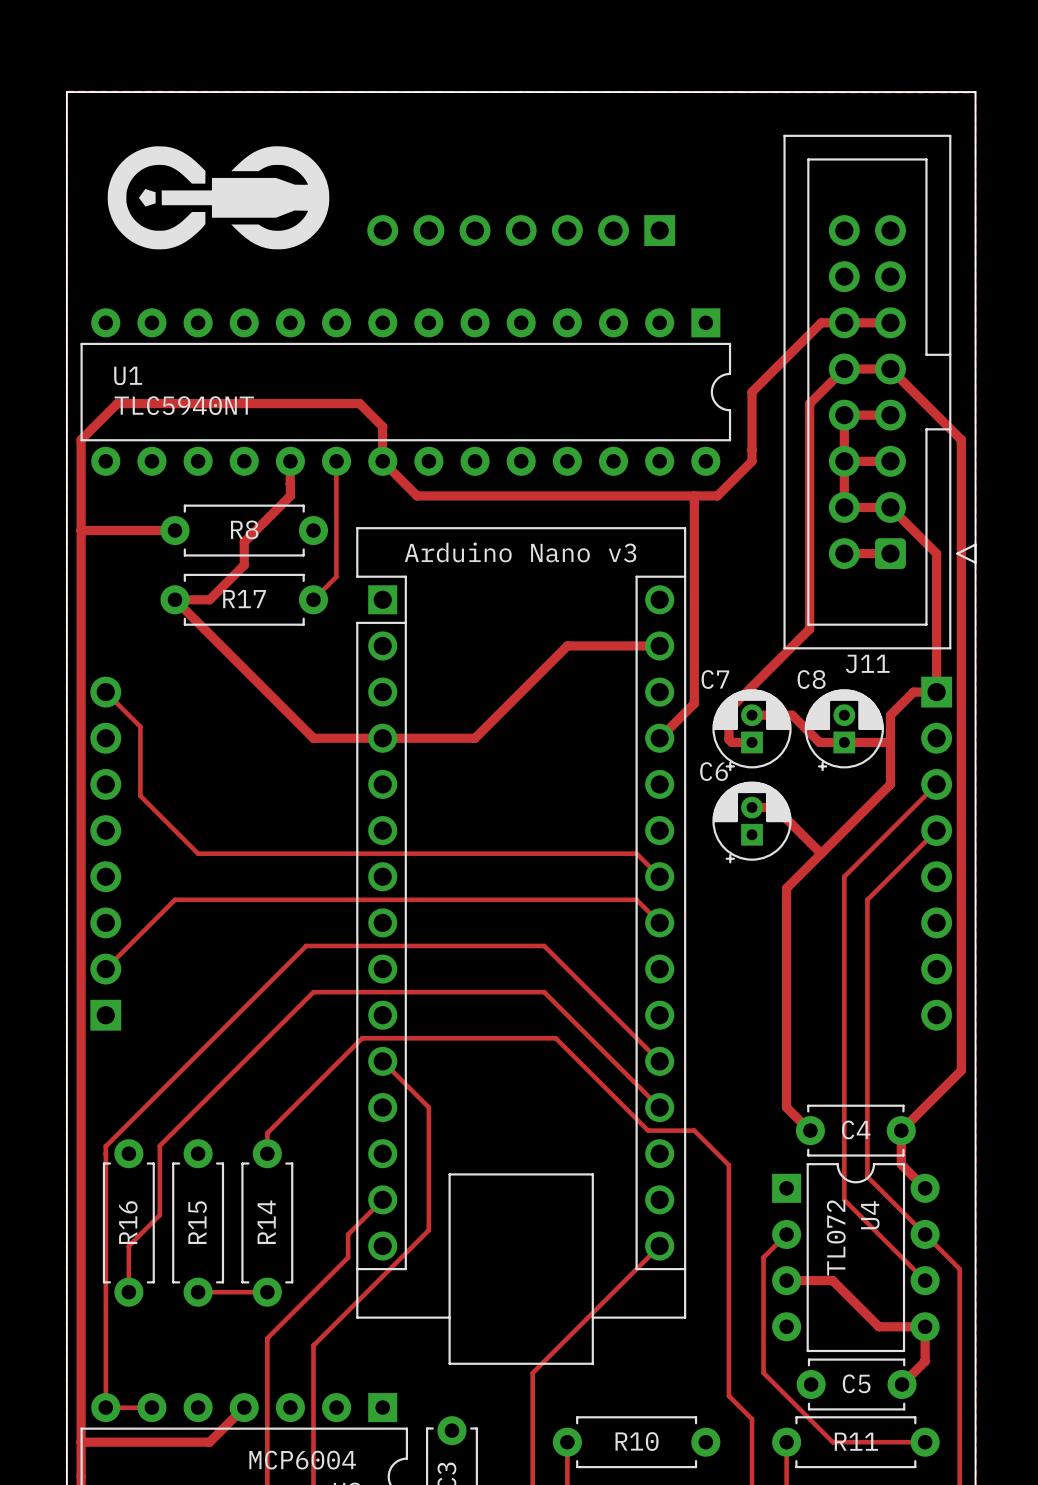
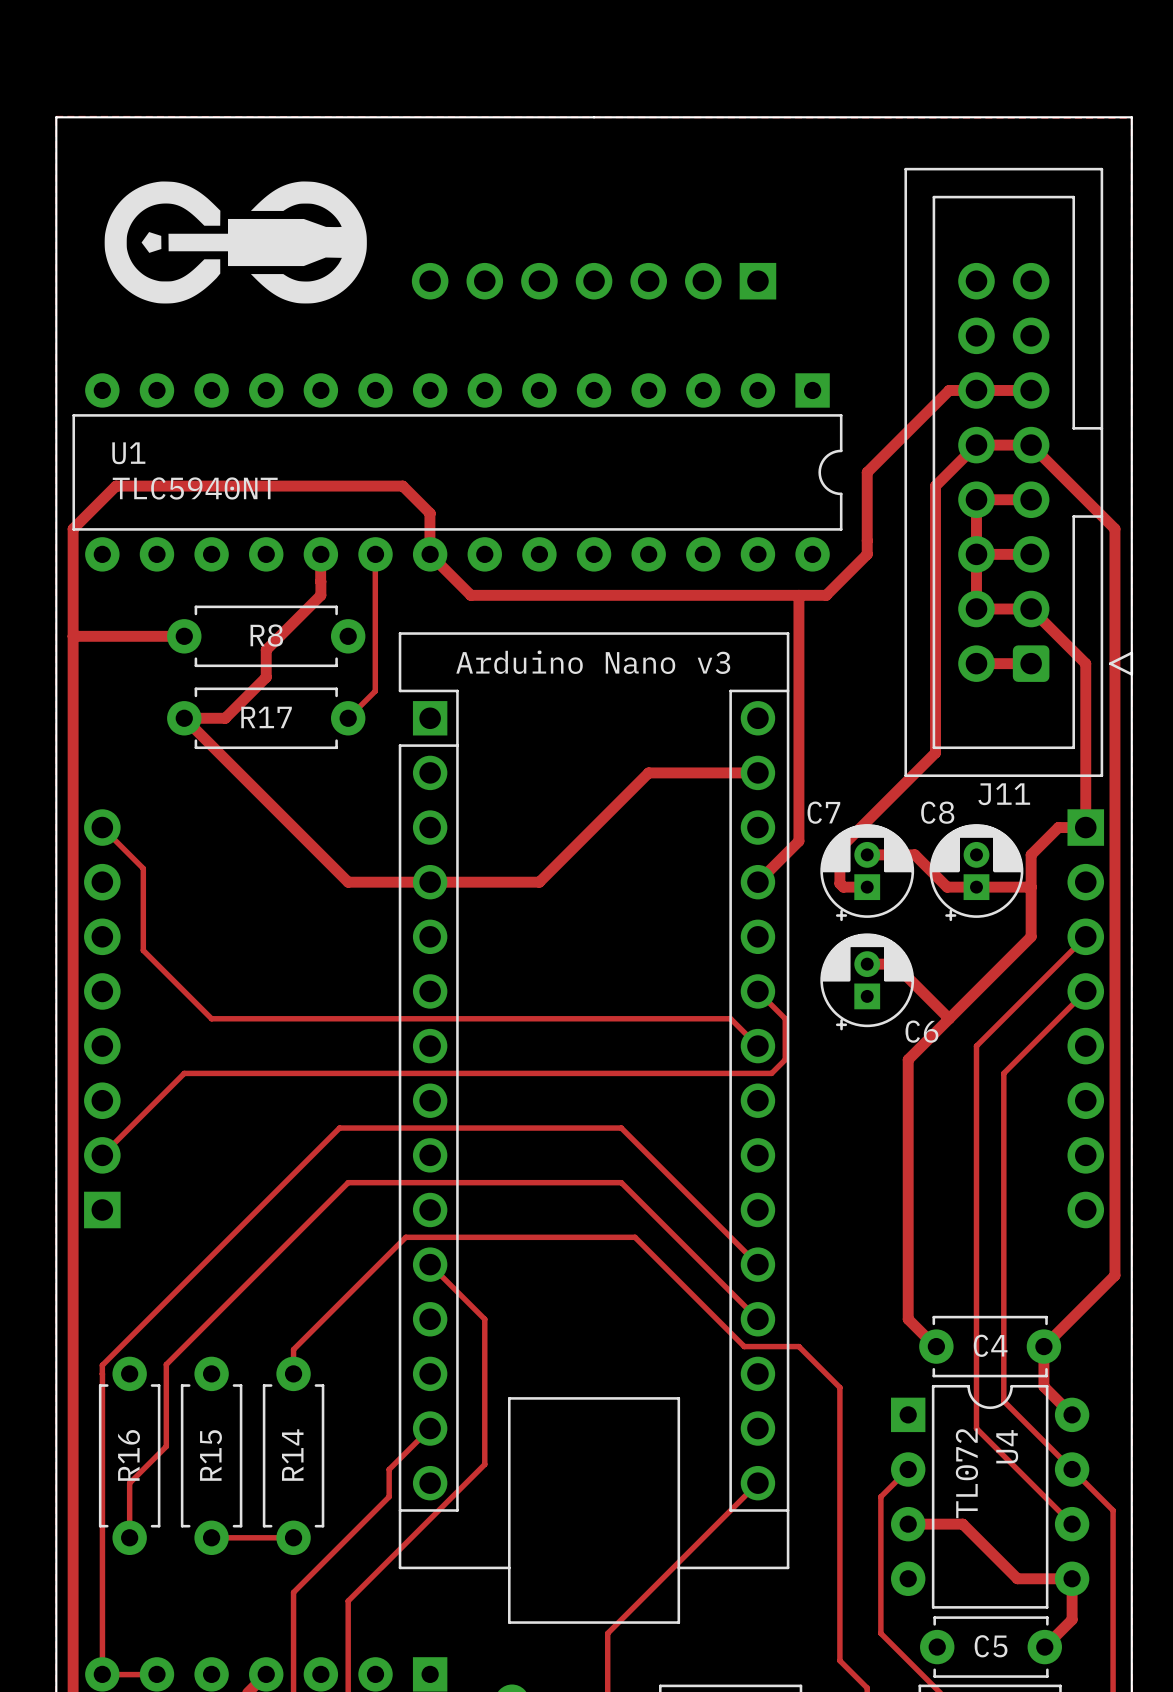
C6 name position: C6 (714, 771) -> C6 (921, 1031)
track: (636, 899) (659, 922) -> (730, 1073) (771, 1073) (785, 1059) (785, 1018) (757, 991)

